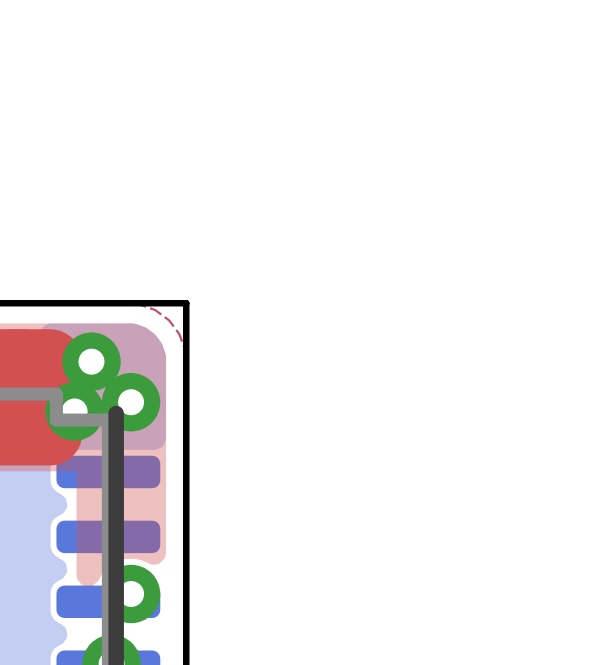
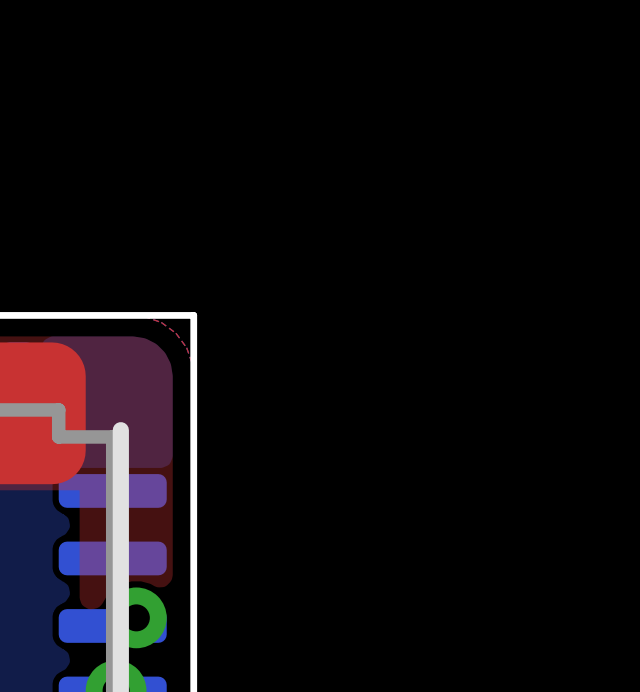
via: (91, 361) -> none
via: (131, 402) -> none
via: (74, 411) -> none

